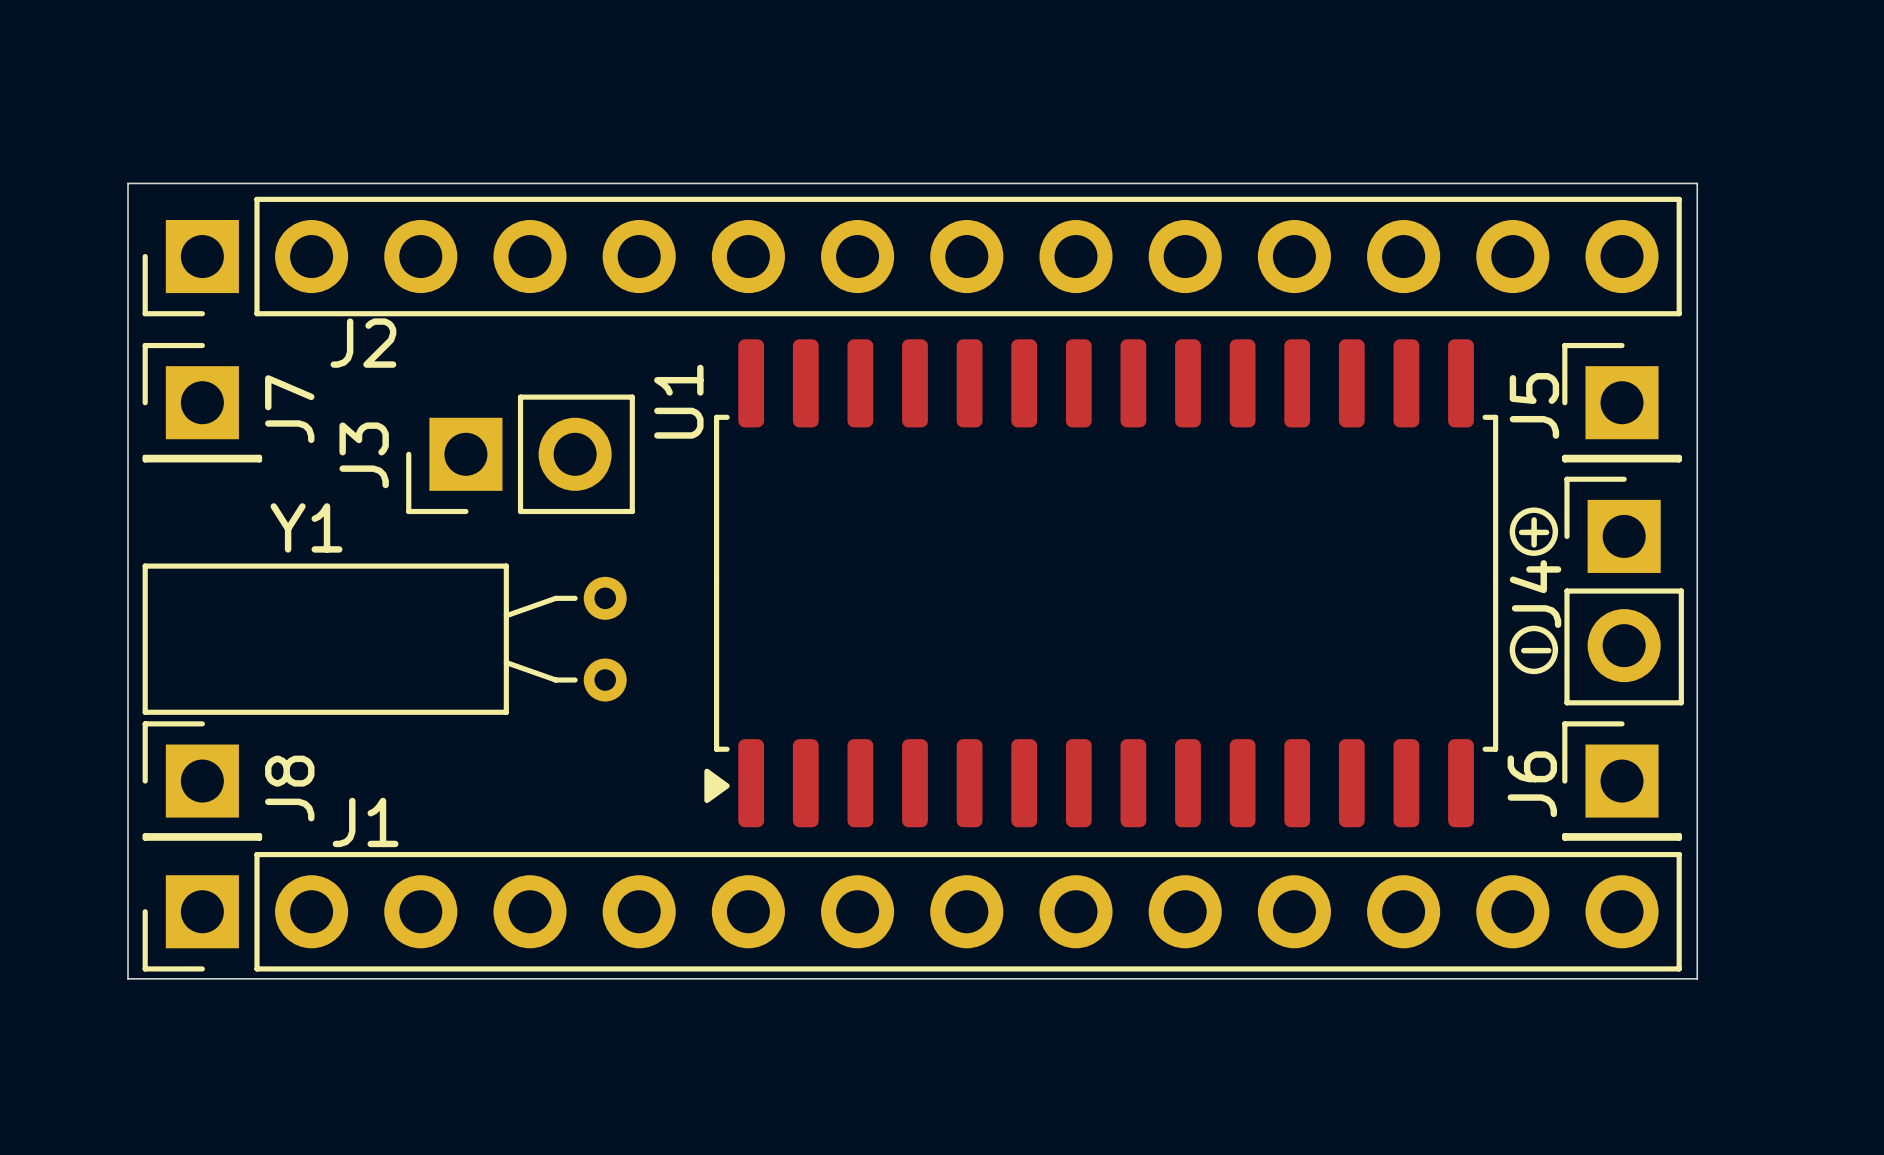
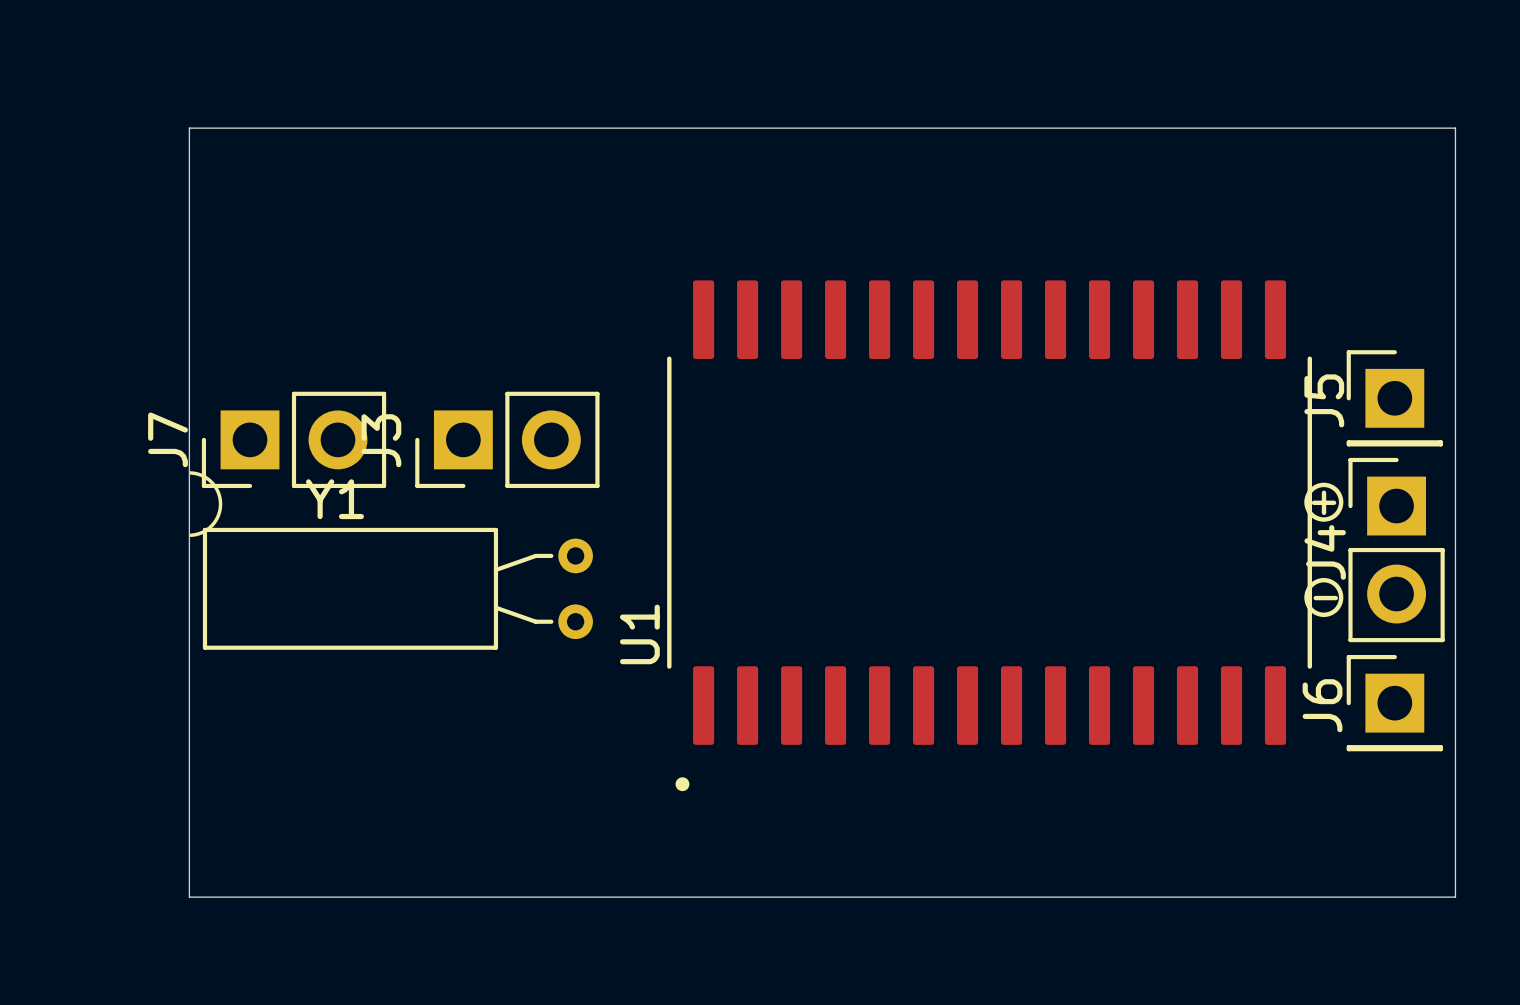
board edge: (1697, 183) (128, 183) (128, 978) (1697, 978) -> (1455, 221) (1455, 128) (189, 128) (189, 897) (1455, 897) (1455, 862)
J2: (912, 256) -> none
U1 footprint: [704, 339, 1499, 828] -> [667, 280, 1312, 792]
J7 footprint: [142, 342, 263, 463] -> [201, 391, 387, 489]
U1 name position: U1 (678, 401) -> U1 (639, 634)
J7 name position: J7 (289, 409) -> J7 (168, 439)
line: none -> (190, 472) (202, 475) (211, 482) (218, 492) (220, 503) (218, 515) (212, 525) (202, 532) (191, 535)
J8: (202, 781) -> none
J1: (912, 911) -> none

